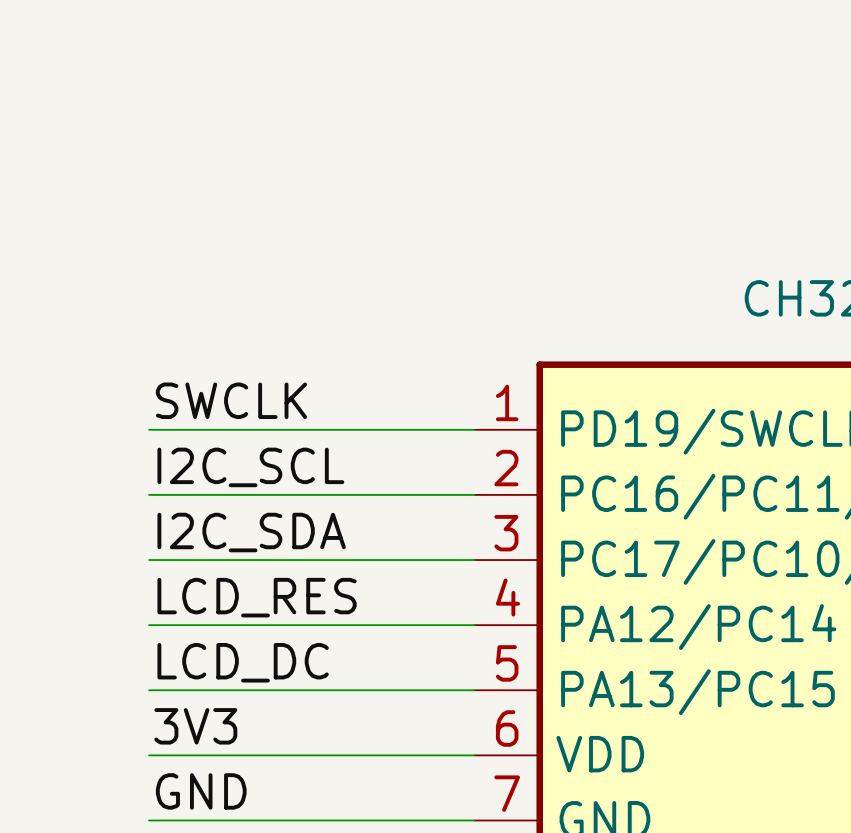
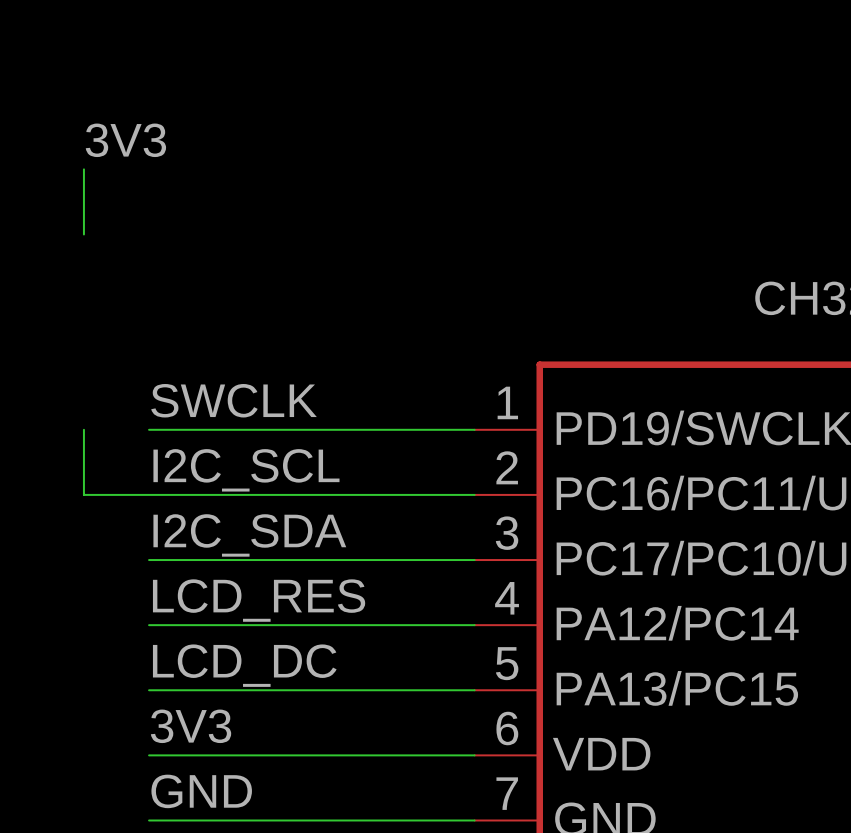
label: none -> 3V3 (125, 140)
wire: none -> (83, 169) (83, 234)
wire: none -> (83, 429) (83, 494) (149, 494)

